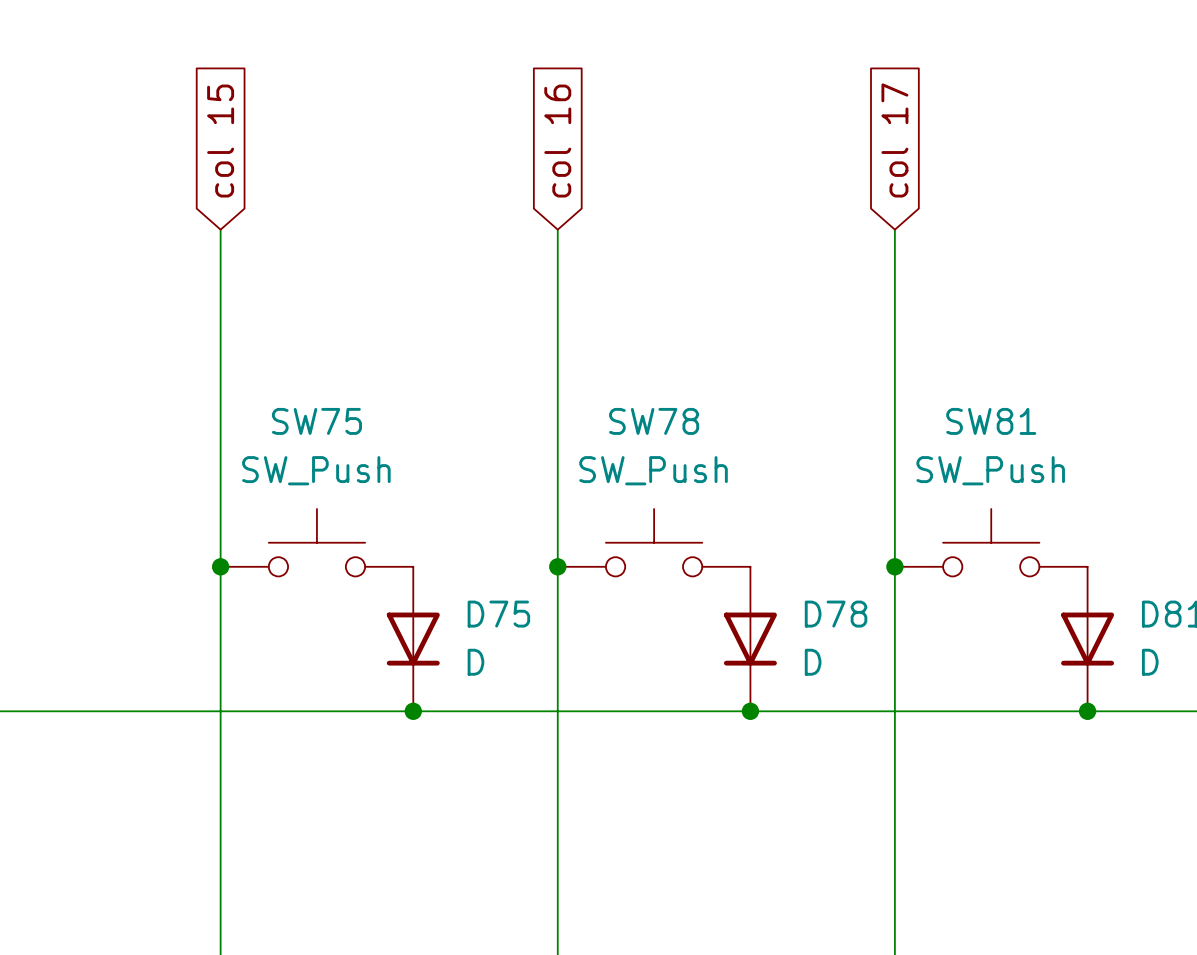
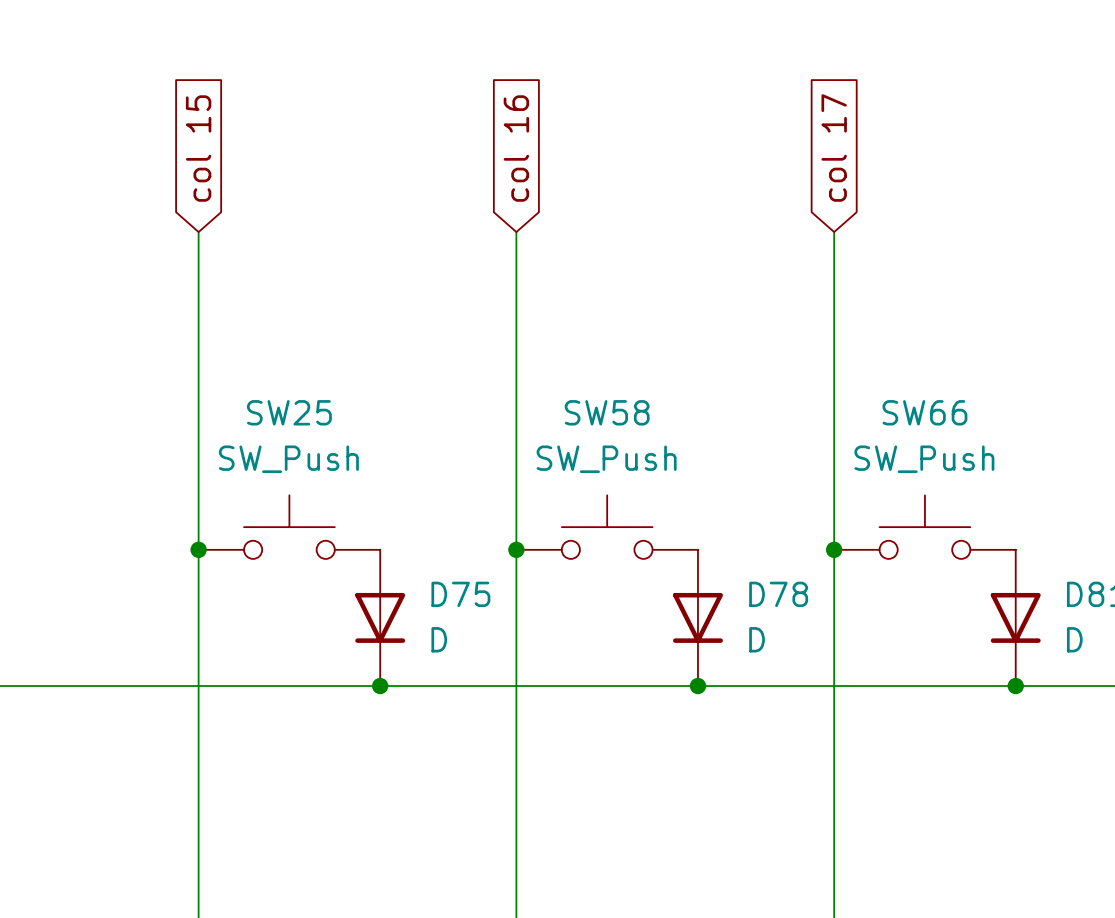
SW75 name: SW75 (316, 421) -> SW25 (289, 412)
SW78 name: SW78 (654, 421) -> SW58 (607, 412)
SW81 name: SW81 (991, 421) -> SW66 (924, 412)

